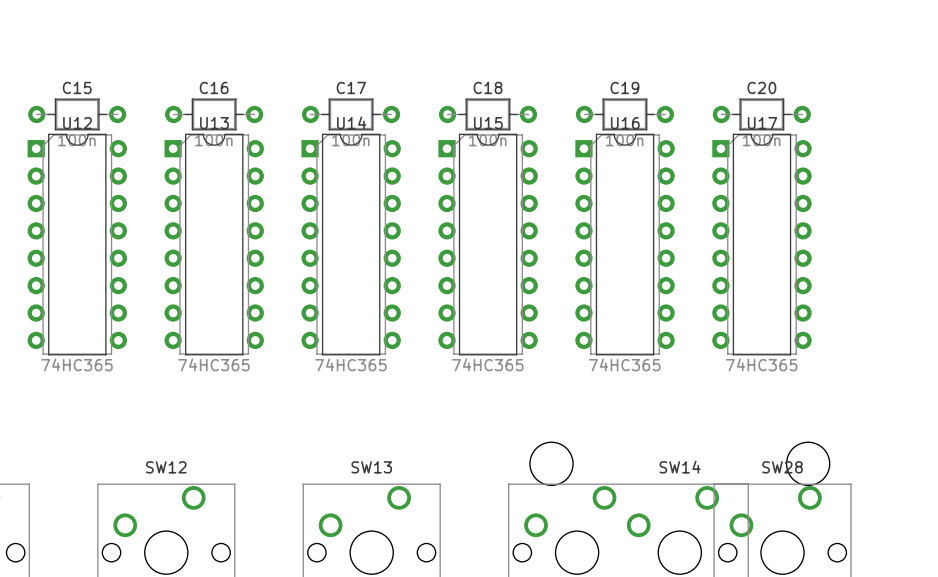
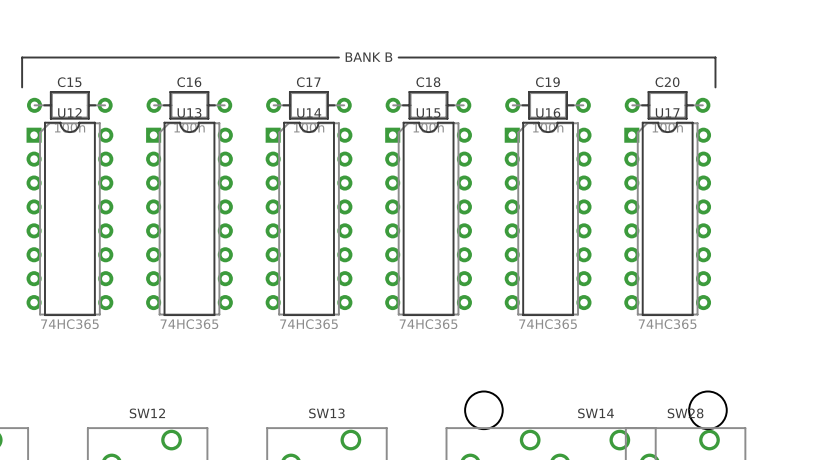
line: none -> (338, 57) (22, 57) (22, 87)
text: none -> BANK B (368, 57)
line: none -> (398, 57) (715, 57) (715, 87)

